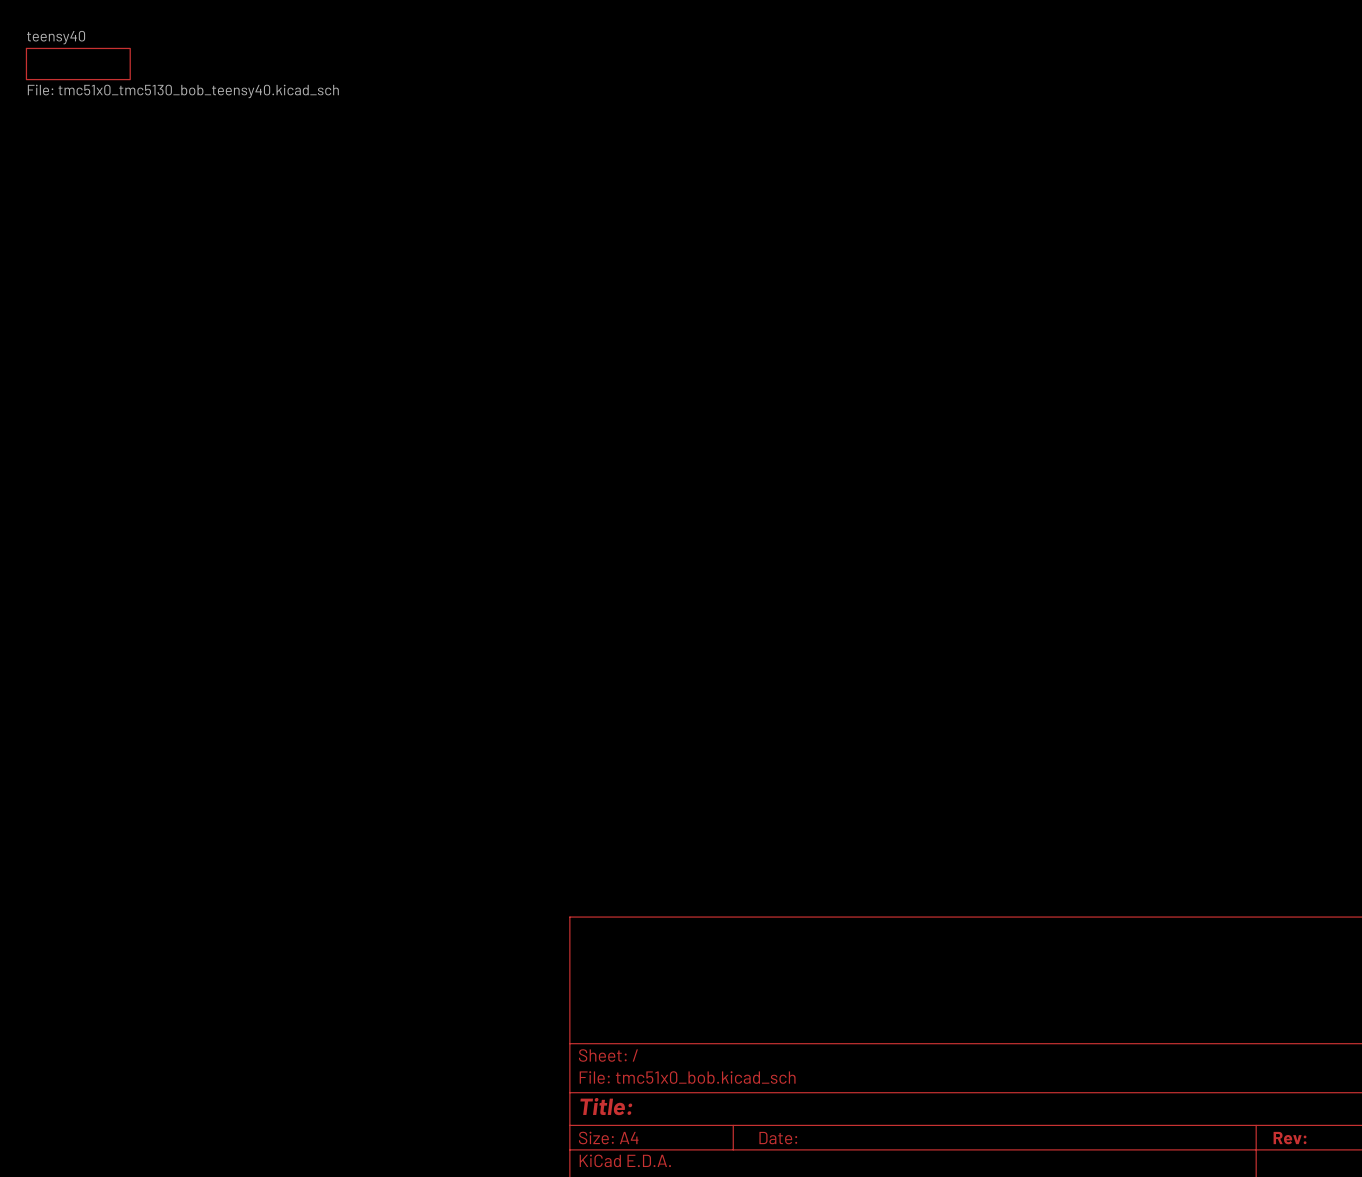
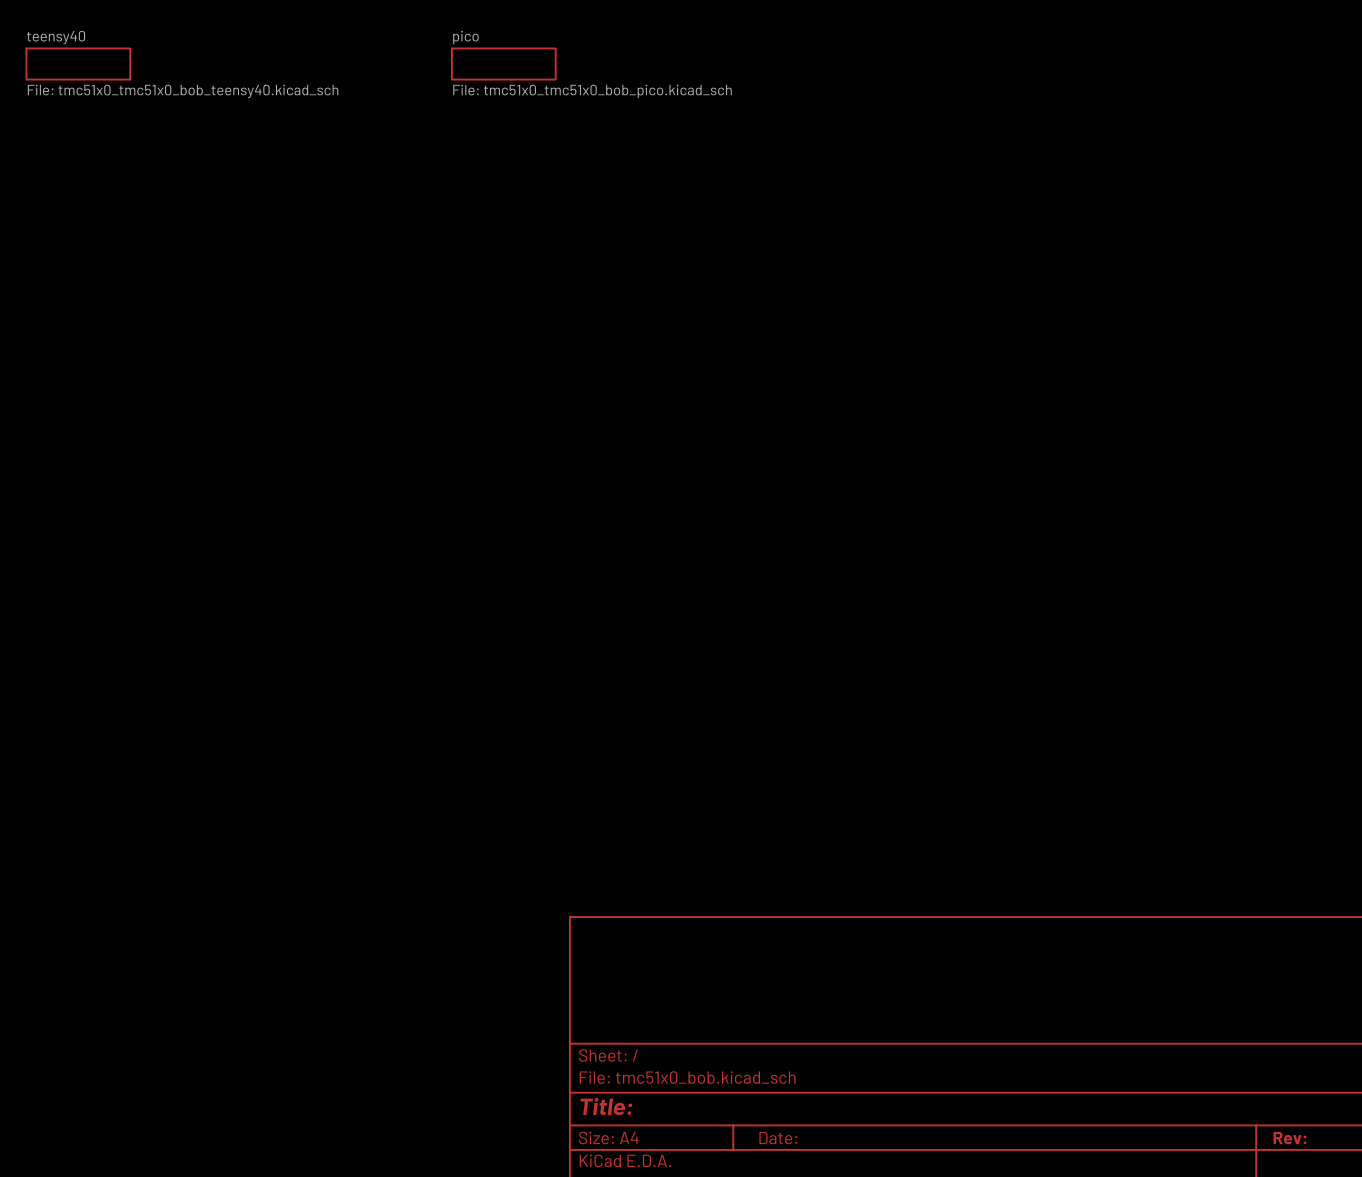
sheet pico: none -> File: tmc51x0_tmc51x0_bob_pico.kicad_sch (503, 64)
sheet teensy40 value: File: tmc51x0_tmc5130_bob_teensy40.kicad_sch (183, 91) -> File: tmc51x0_tmc51x0_bob_teensy40.kicad_sch (183, 91)

